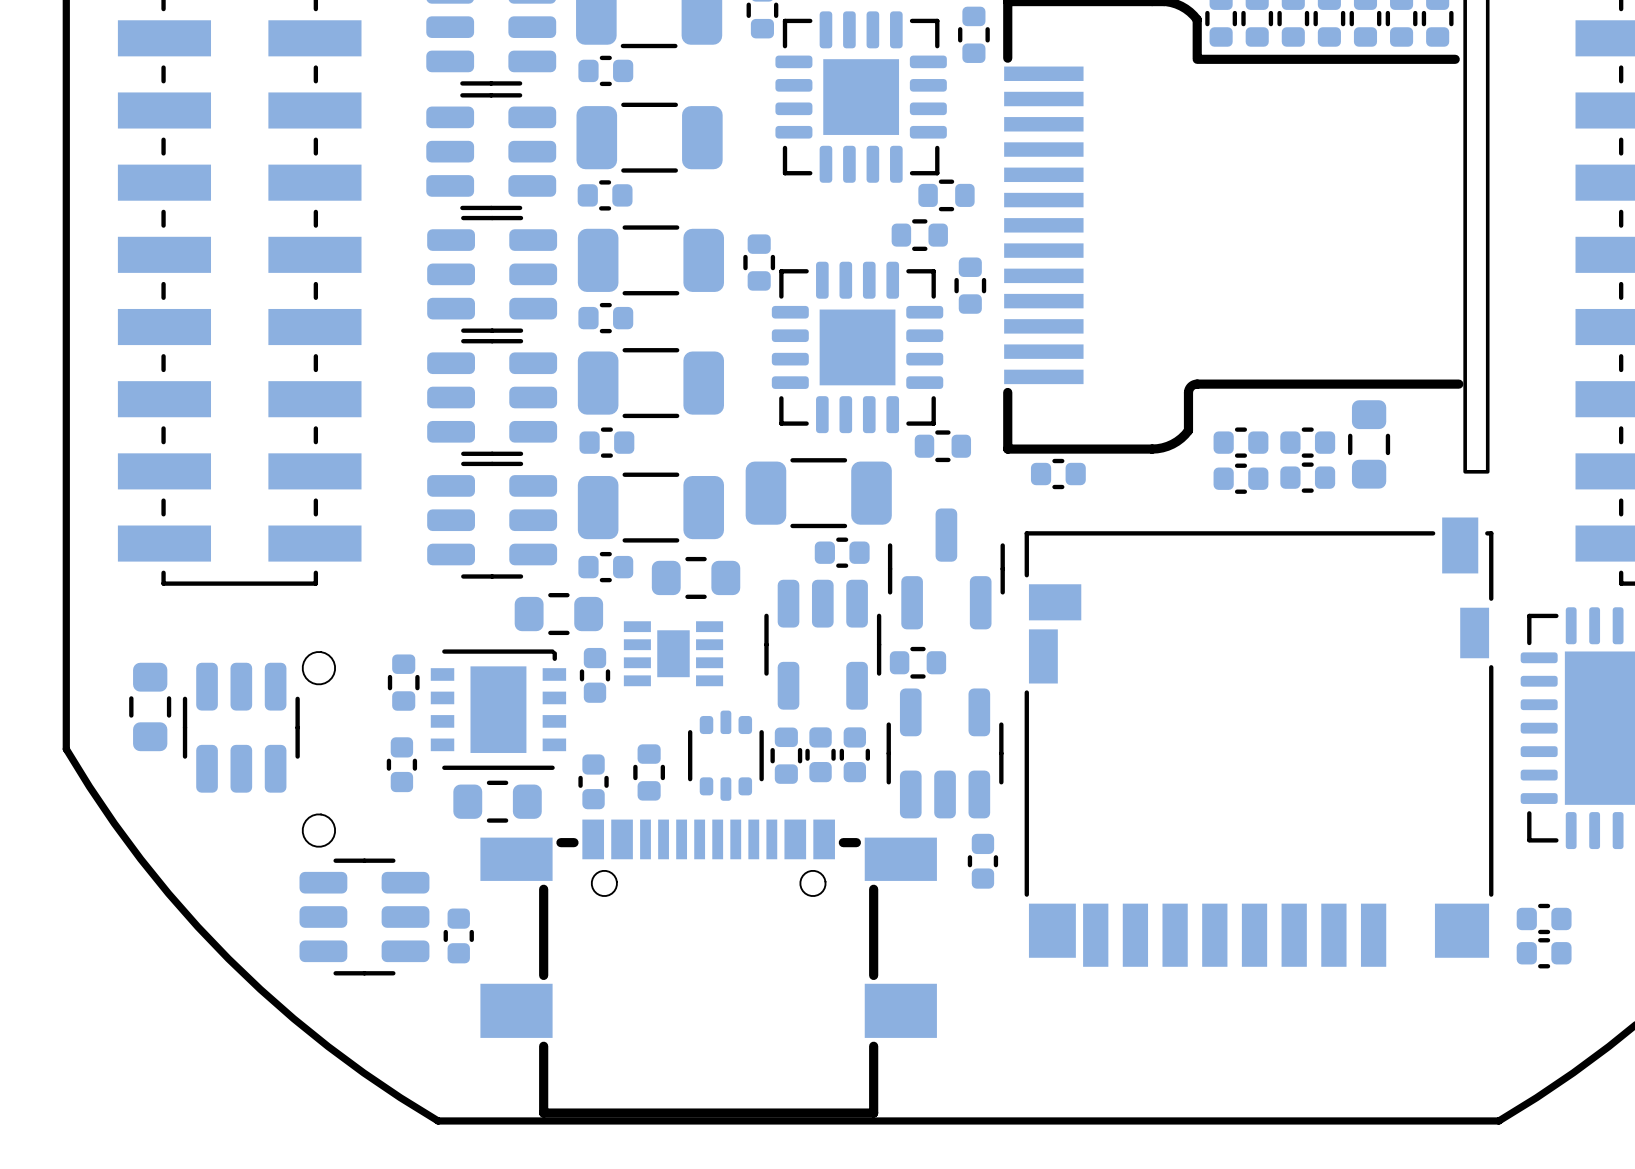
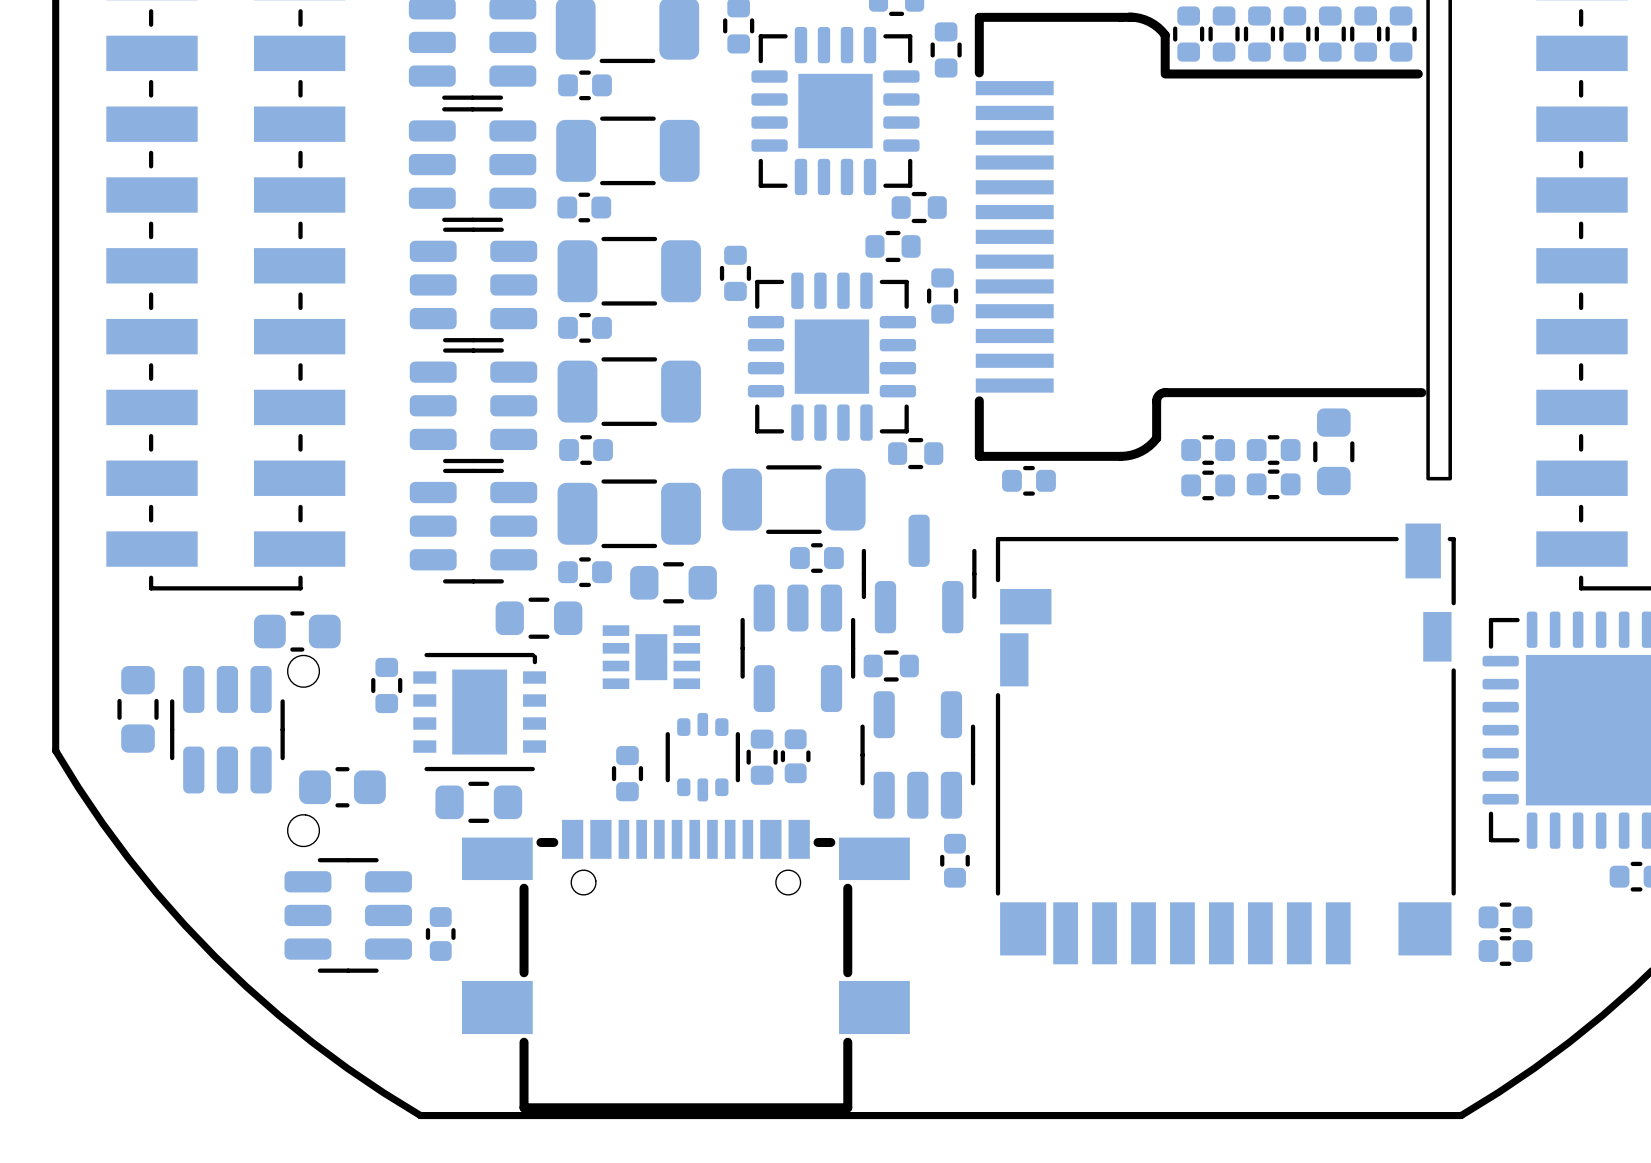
part: none -> (297, 631)
part: (594, 675) -> none
part: (854, 754) -> none
part: (401, 764) -> none
part: (593, 781) -> none
part: none -> (342, 787)

